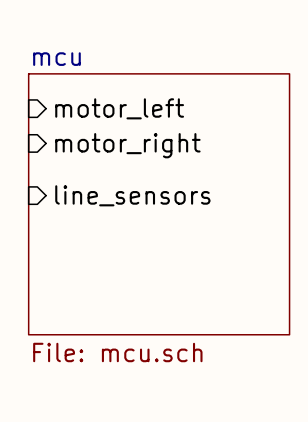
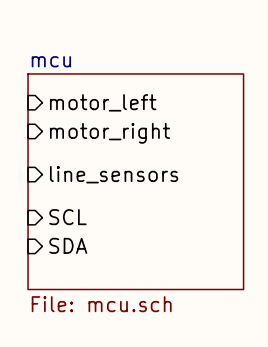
sheet pin: none -> SCL (67, 217)
sheet pin: none -> SDA (68, 245)

